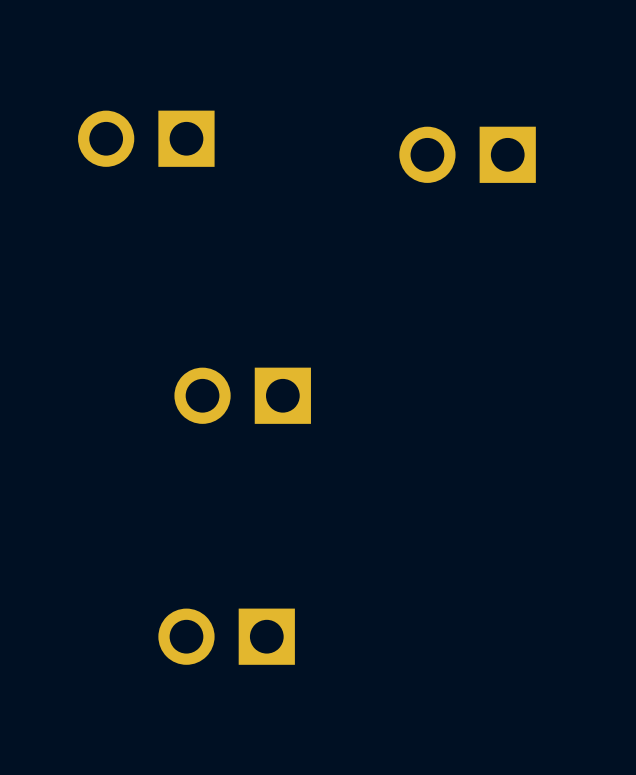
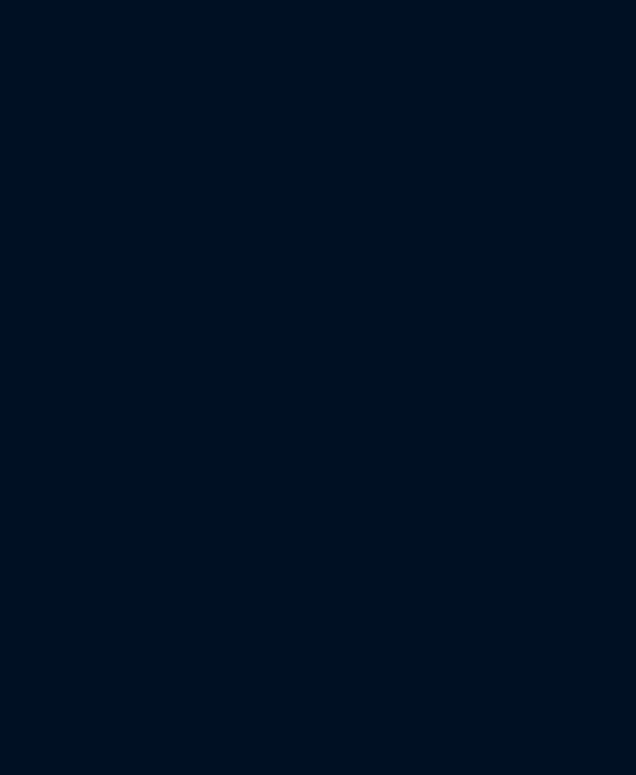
part: (146, 138) -> none
part: (467, 154) -> none
part: (242, 395) -> none
part: (226, 636) -> none

